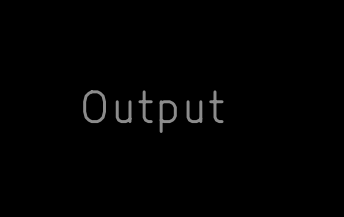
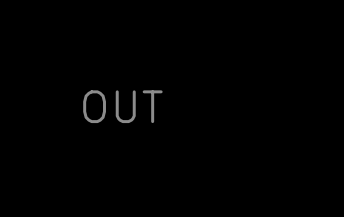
text: Output (153, 111) -> OUT (122, 106)

